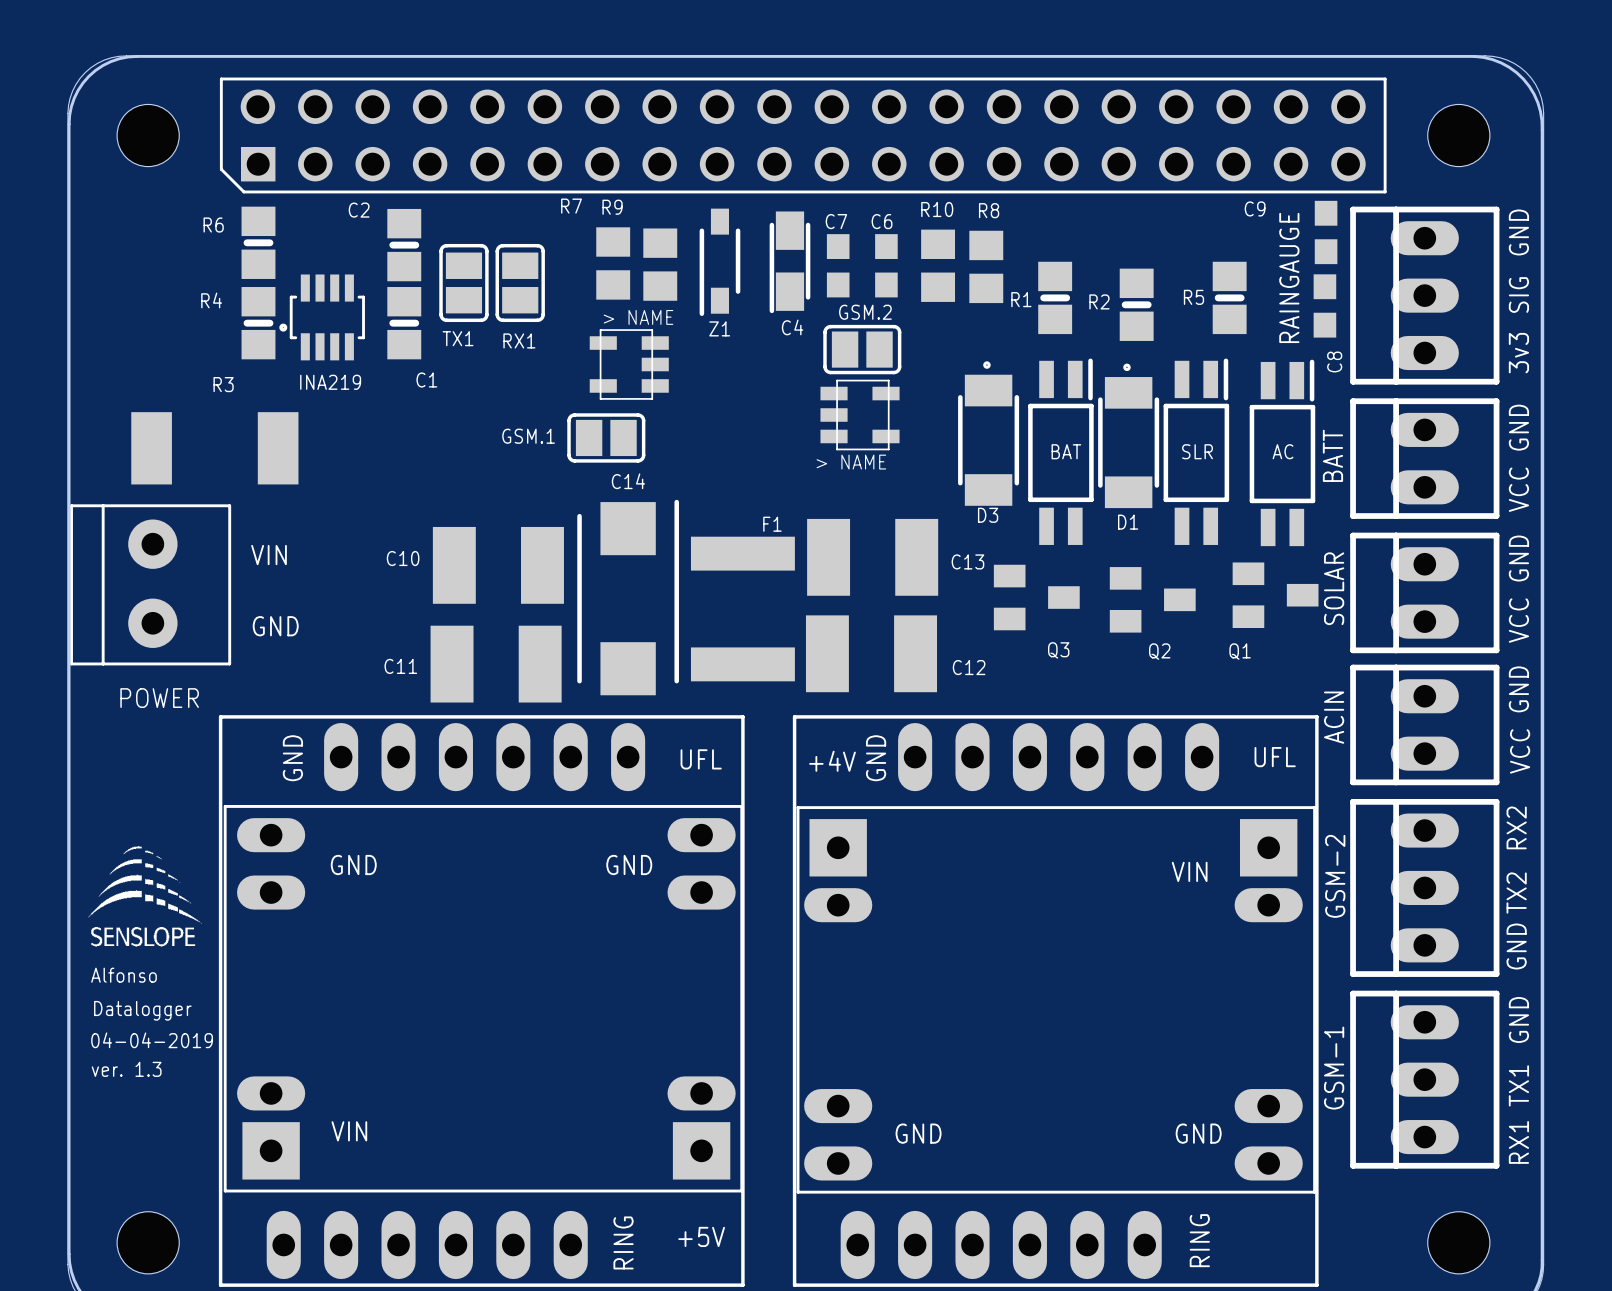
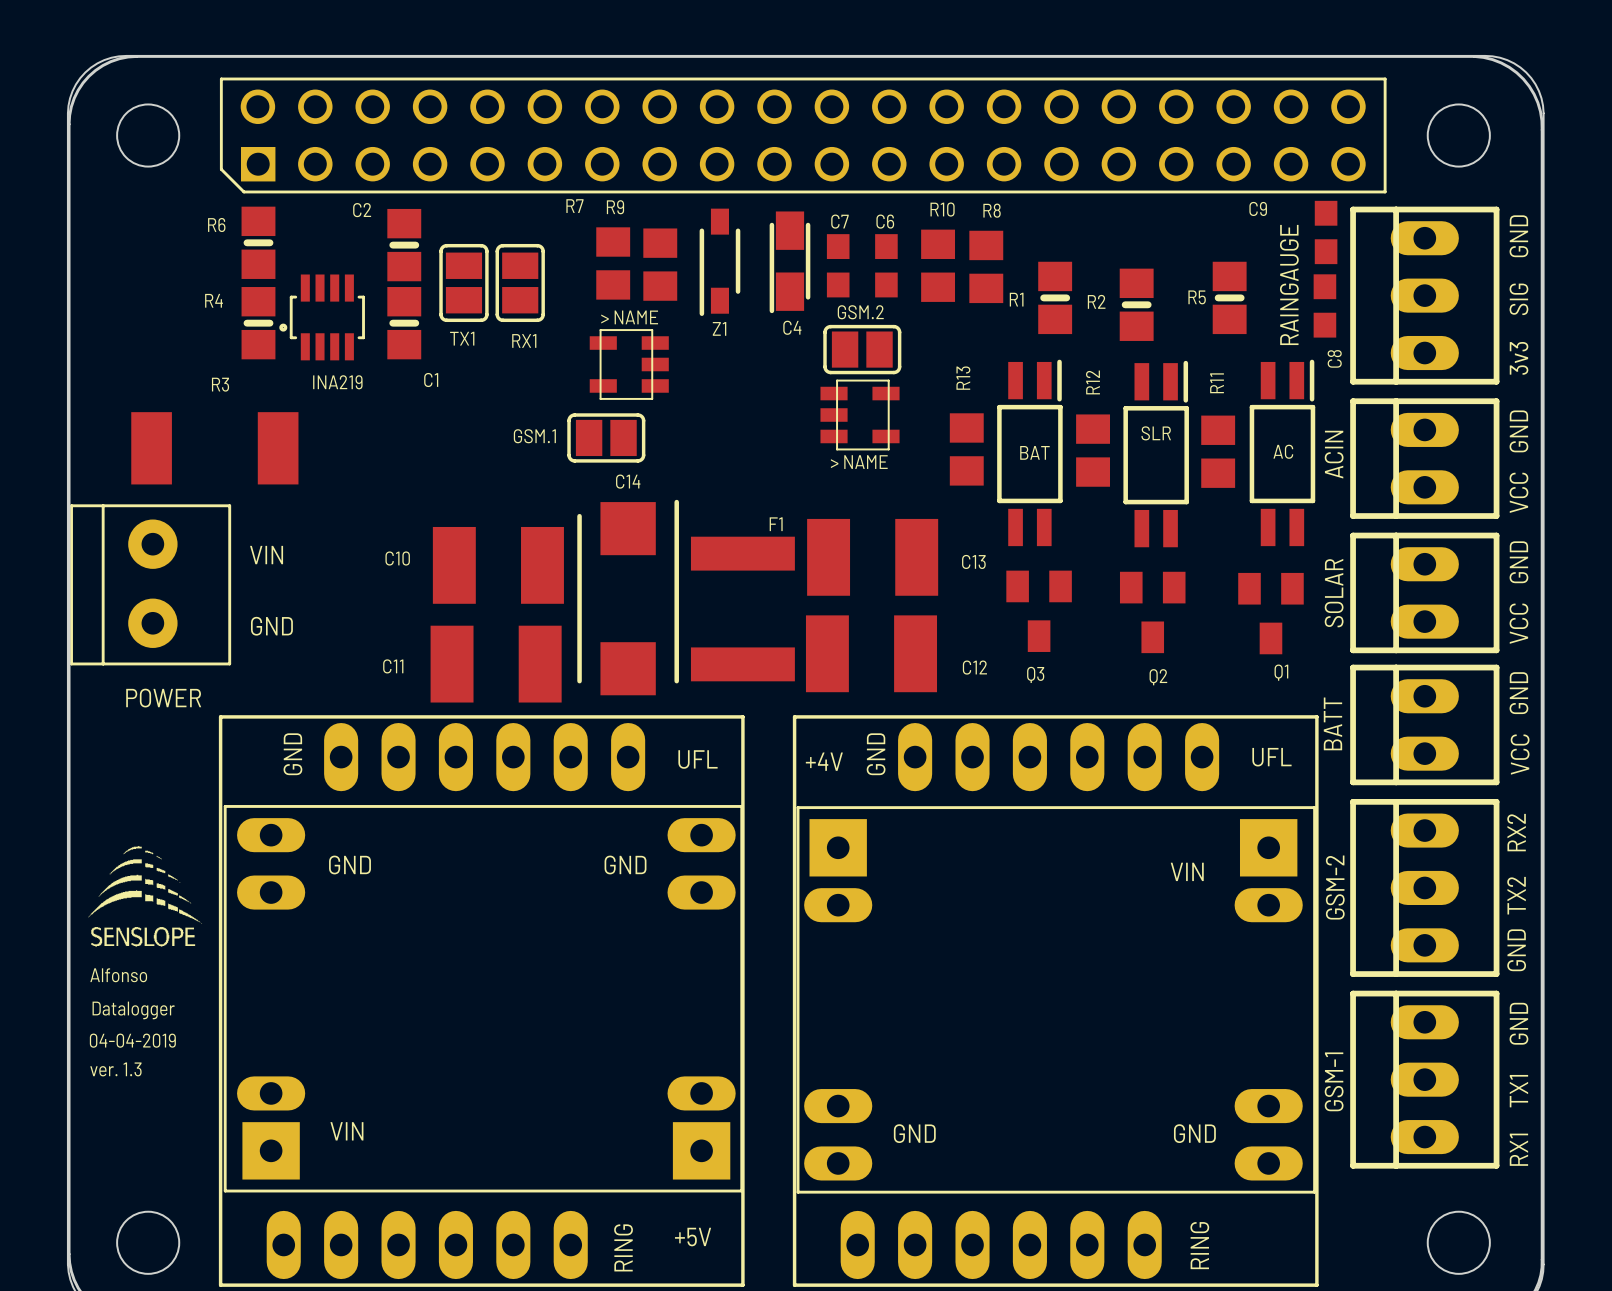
D3: (988, 433) -> none
D1: (1128, 435) -> none
R13: none -> (966, 449)
R12: none -> (1093, 450)
BAT position: (1060, 451) -> (1029, 452)
SLR position: (1196, 451) -> (1156, 454)
SLR name position: SLR (1197, 451) -> SLR (1156, 433)
R11: none -> (1218, 451)
BATT name: BATT (1332, 455) -> ACIN (1334, 454)
Q1 footprint: [1232, 562, 1319, 629] -> [1238, 572, 1304, 655]
Q3 footprint: [993, 564, 1080, 631] -> [1006, 570, 1072, 652]
Q2 footprint: [1109, 567, 1196, 633] -> [1119, 571, 1186, 654]
ACIN name: ACIN (1334, 717) -> BATT (1332, 723)

